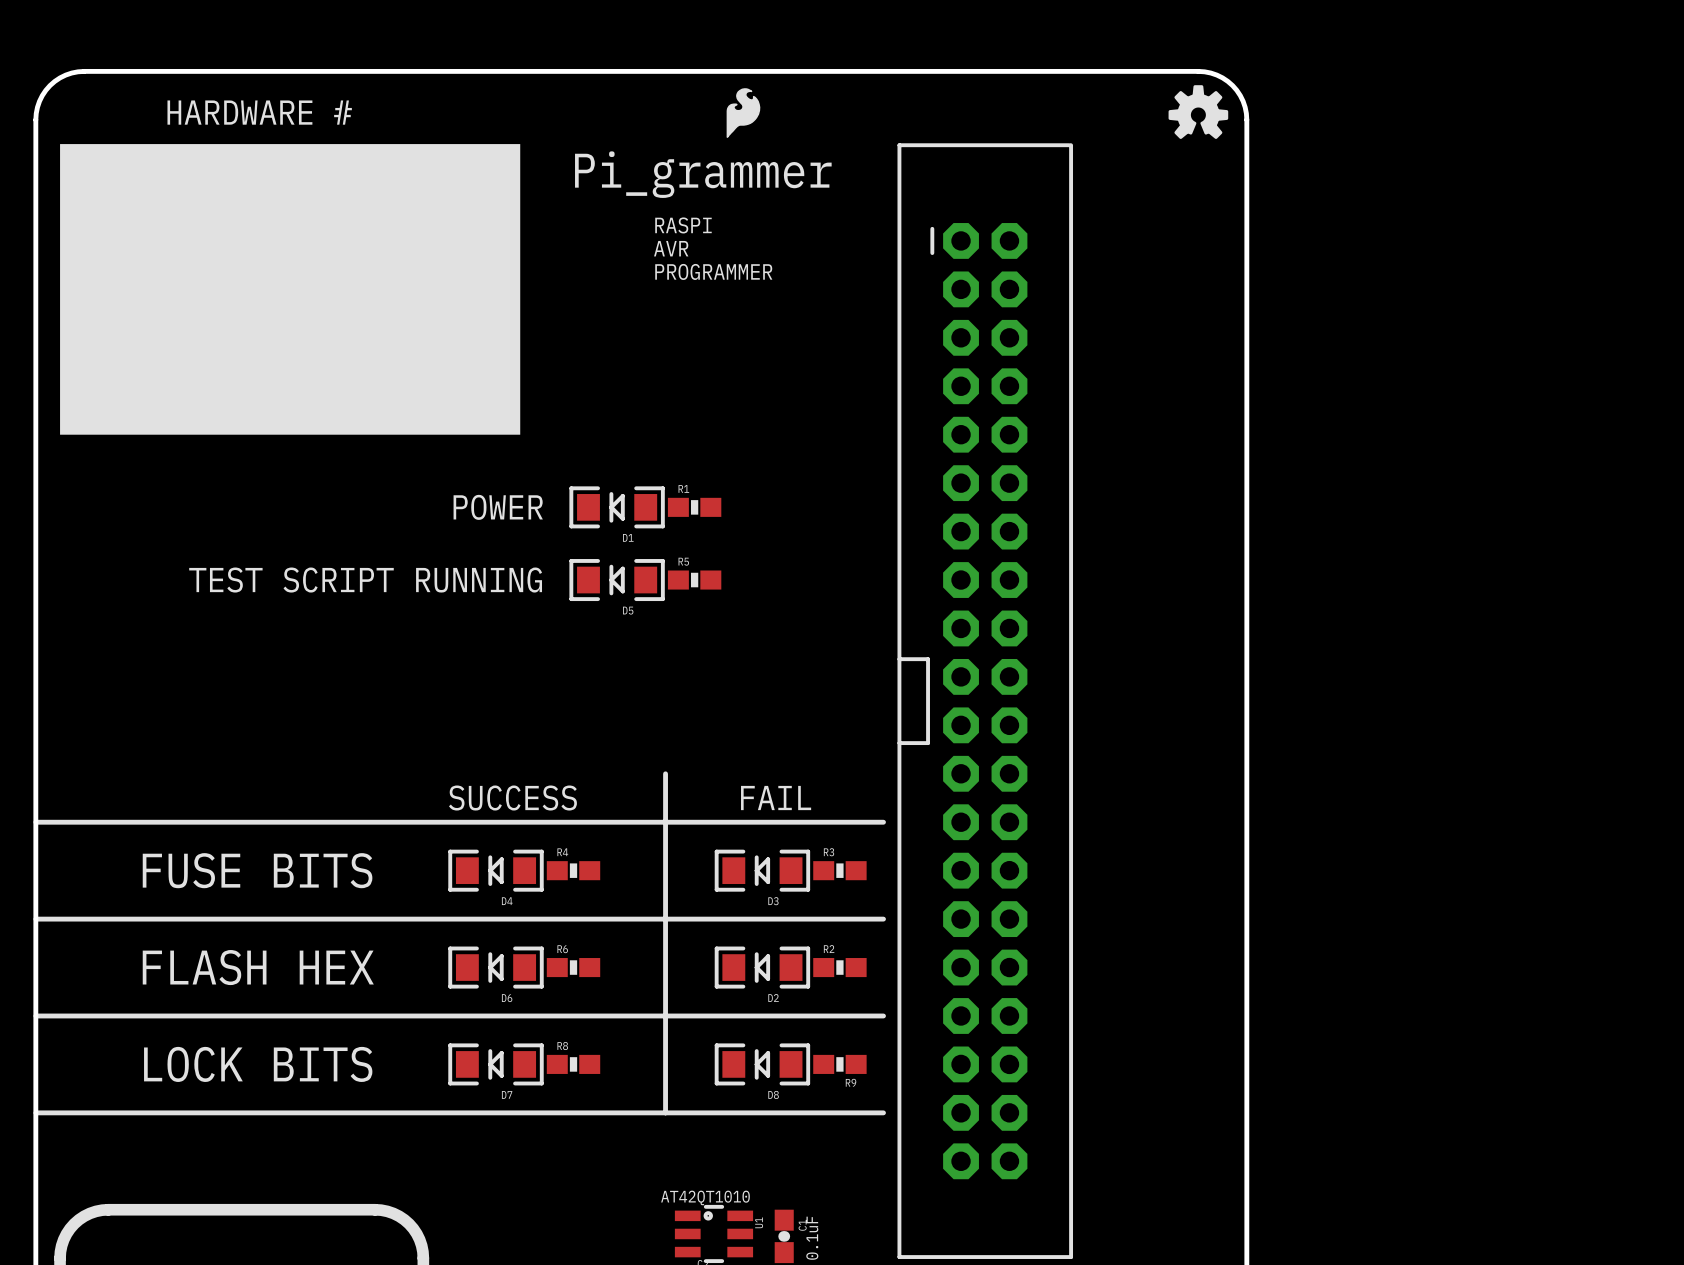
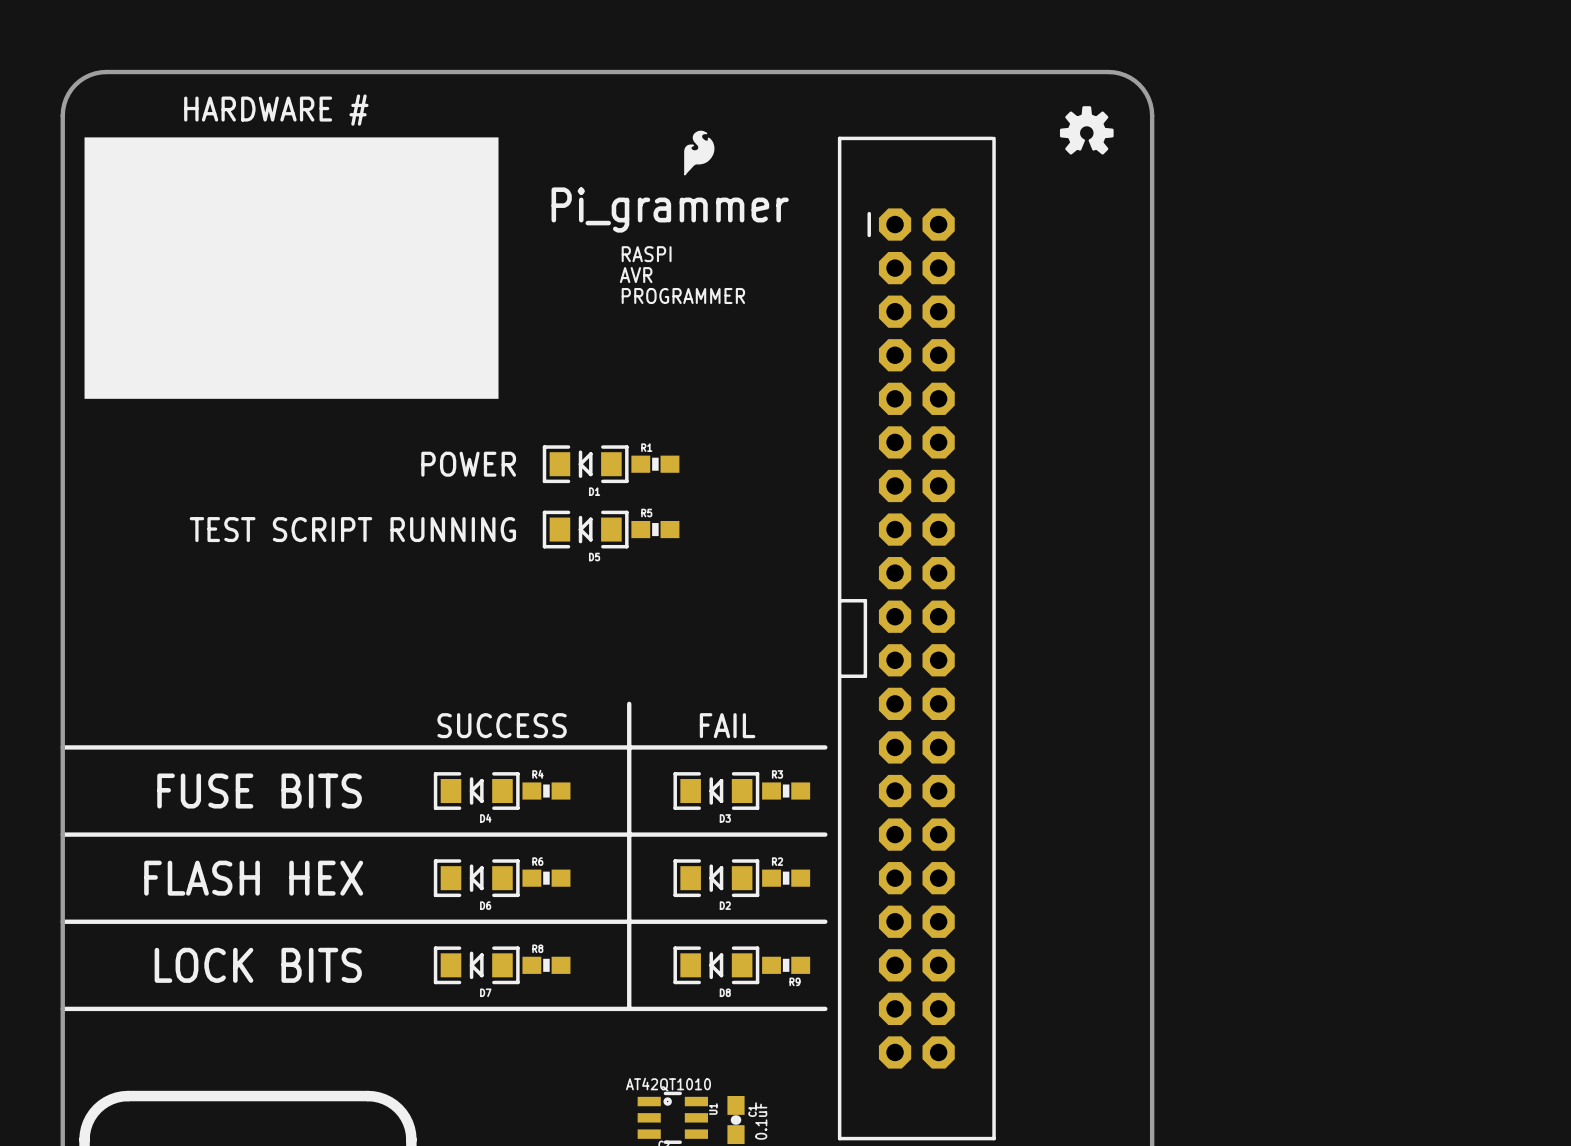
drawing position: (1198, 112) -> (1086, 130)
drawing position: (743, 113) -> (699, 153)
text position: Pi_grammer (703, 174) -> Pi_grammer (670, 210)
text: RASPI (683, 225) -> none
text position: AVR (671, 248) -> AVR (636, 275)
text: PROGRAMMER (713, 271) -> RASPI (646, 254)
text: none -> PROGRAMMER (683, 296)

